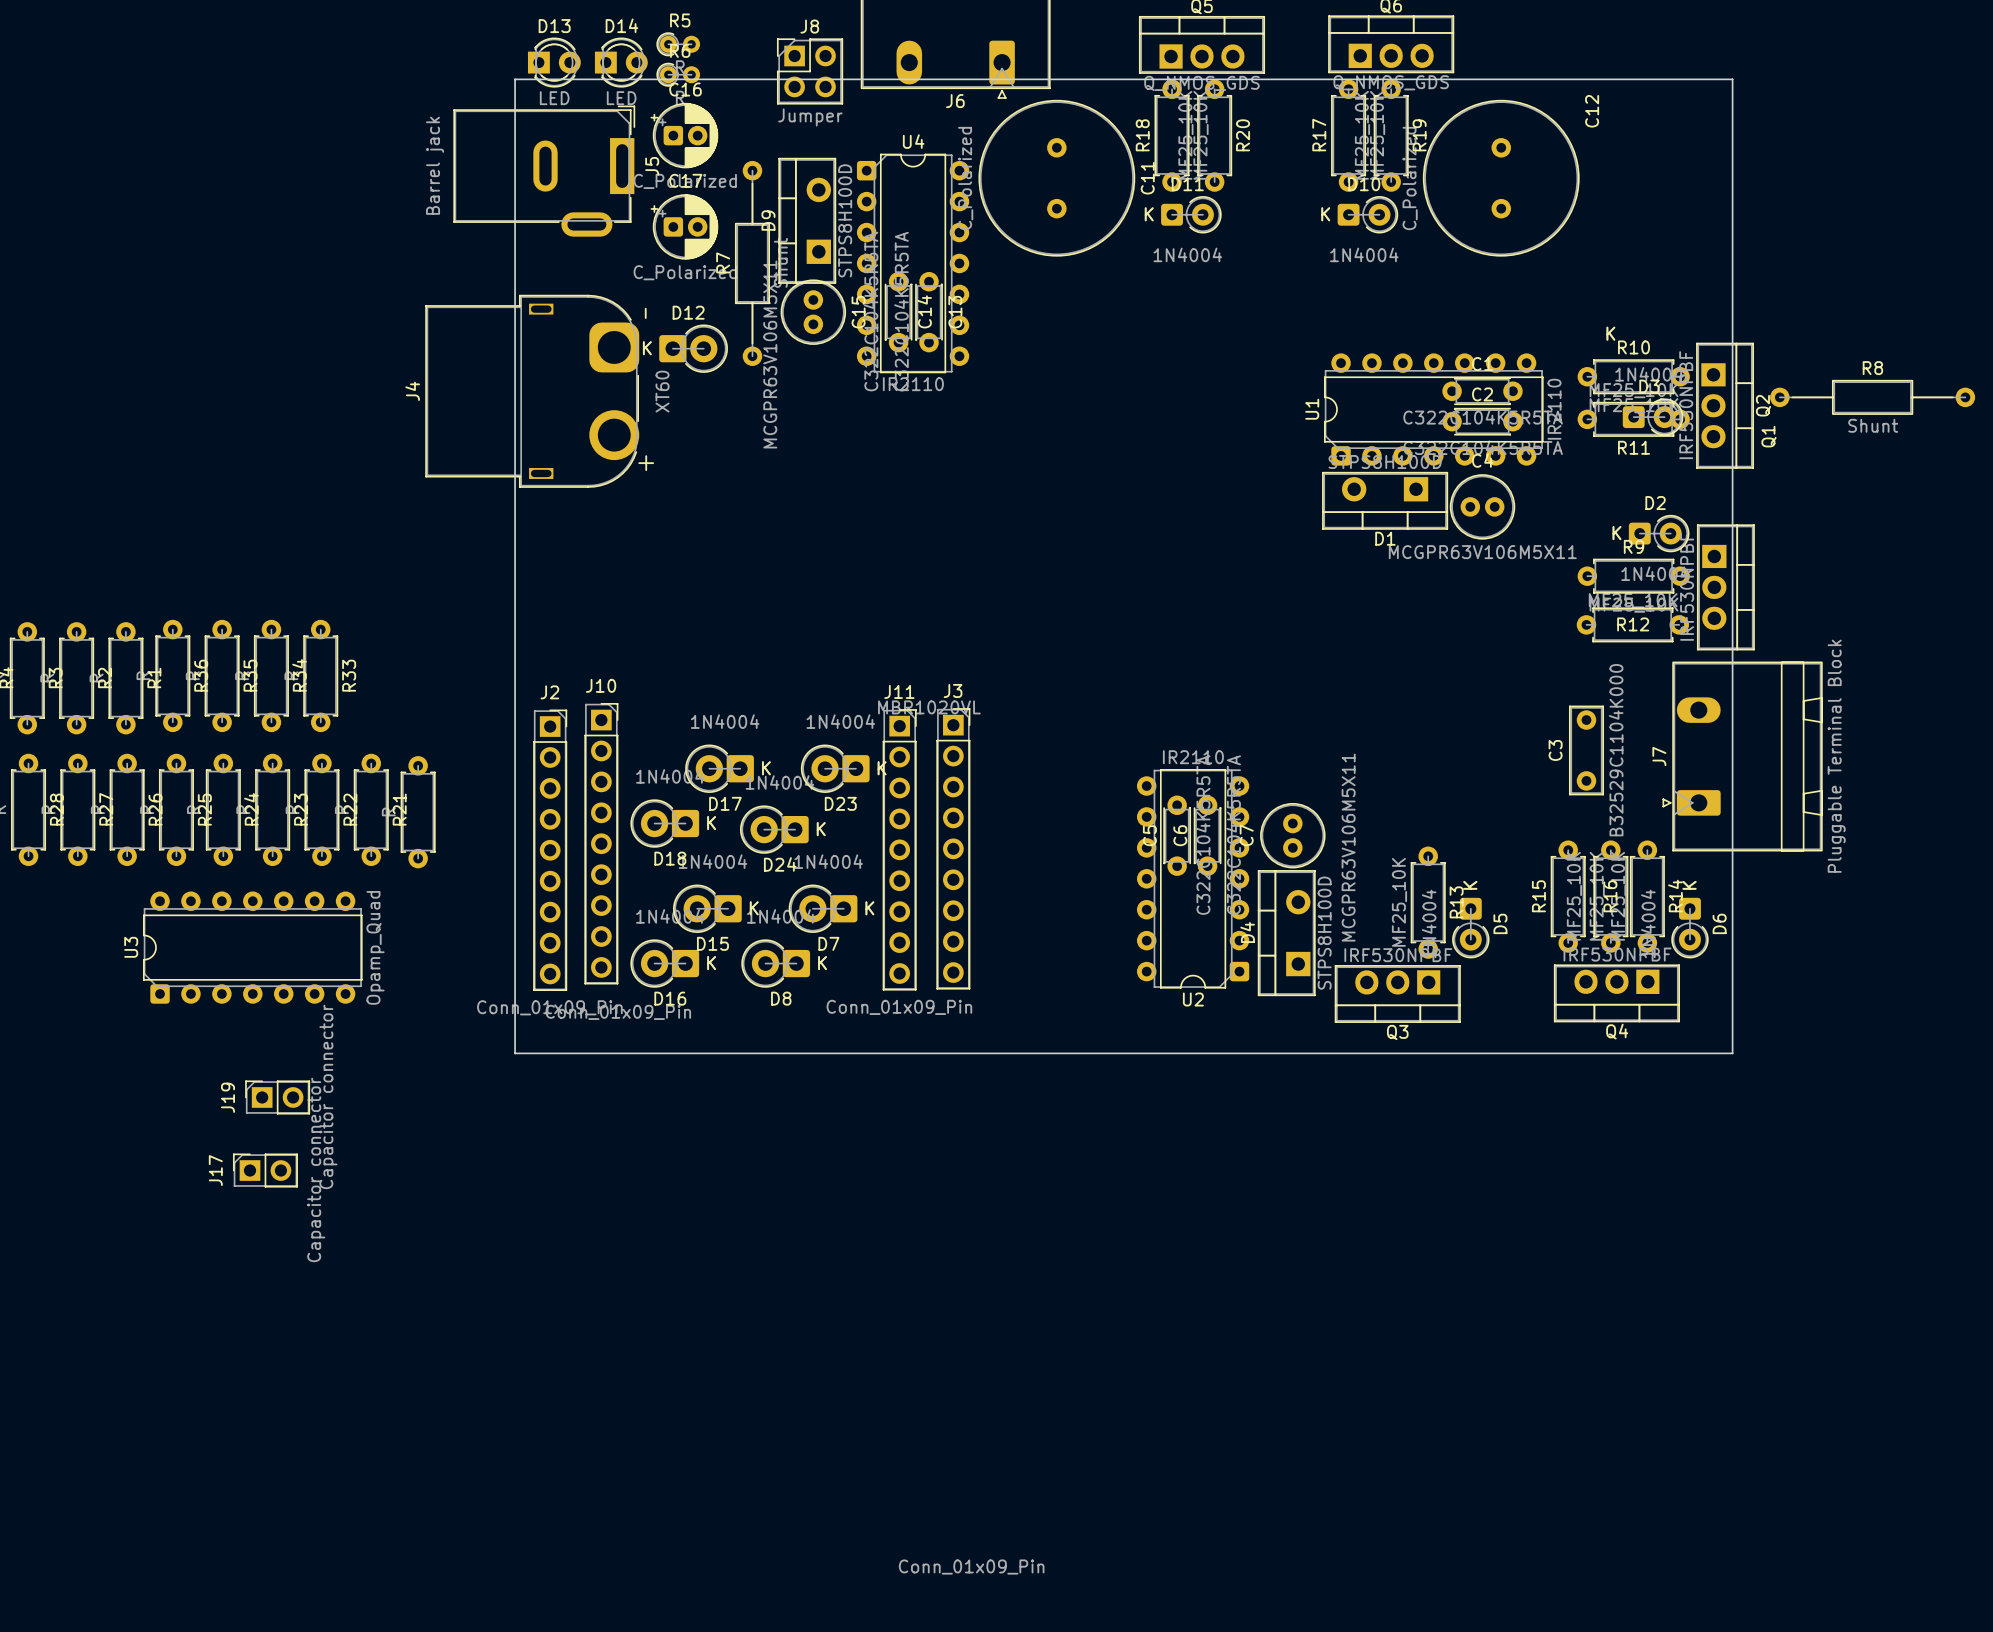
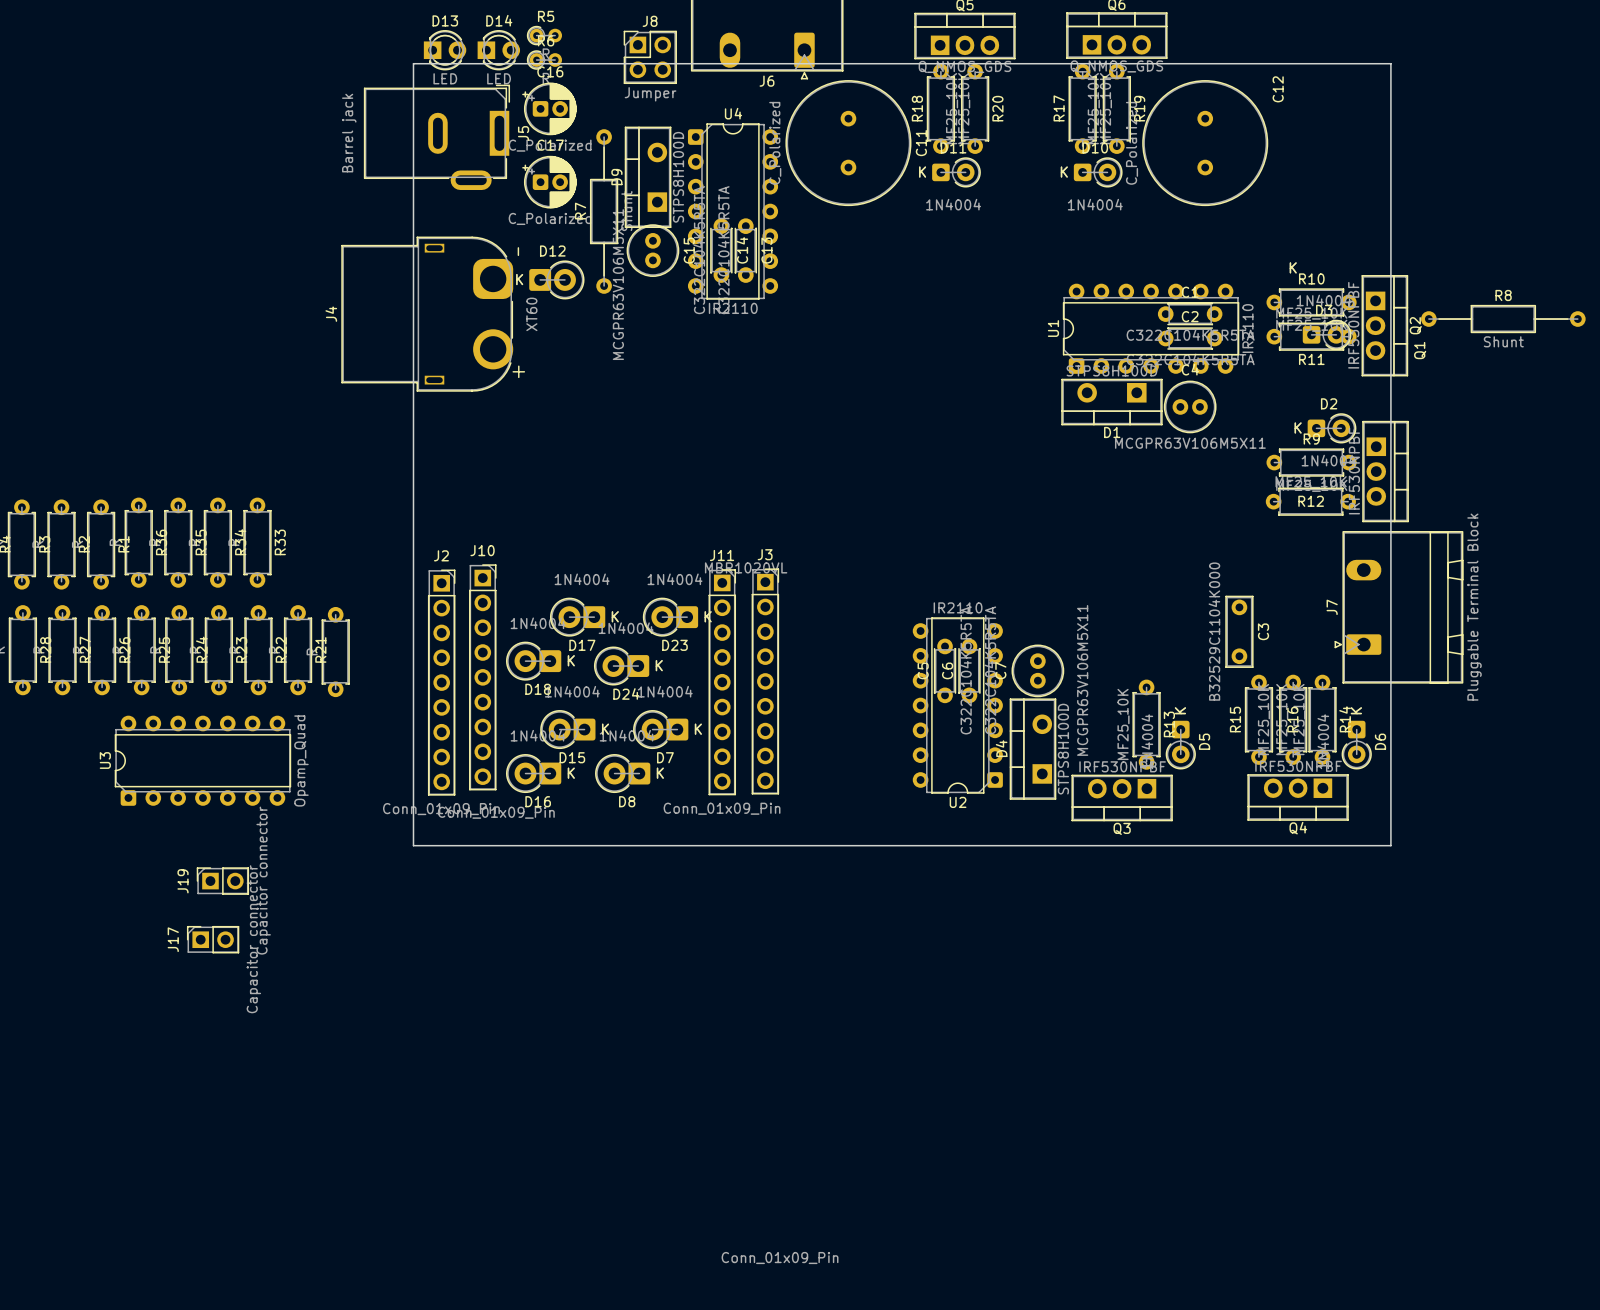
C3 name position: C3 (1555, 750) -> C3 (1263, 631)
C3 position: (1586, 750) -> (1239, 631)
C3 value position: B32529C1104K000 (1616, 750) -> B32529C1104K000 (1214, 631)

